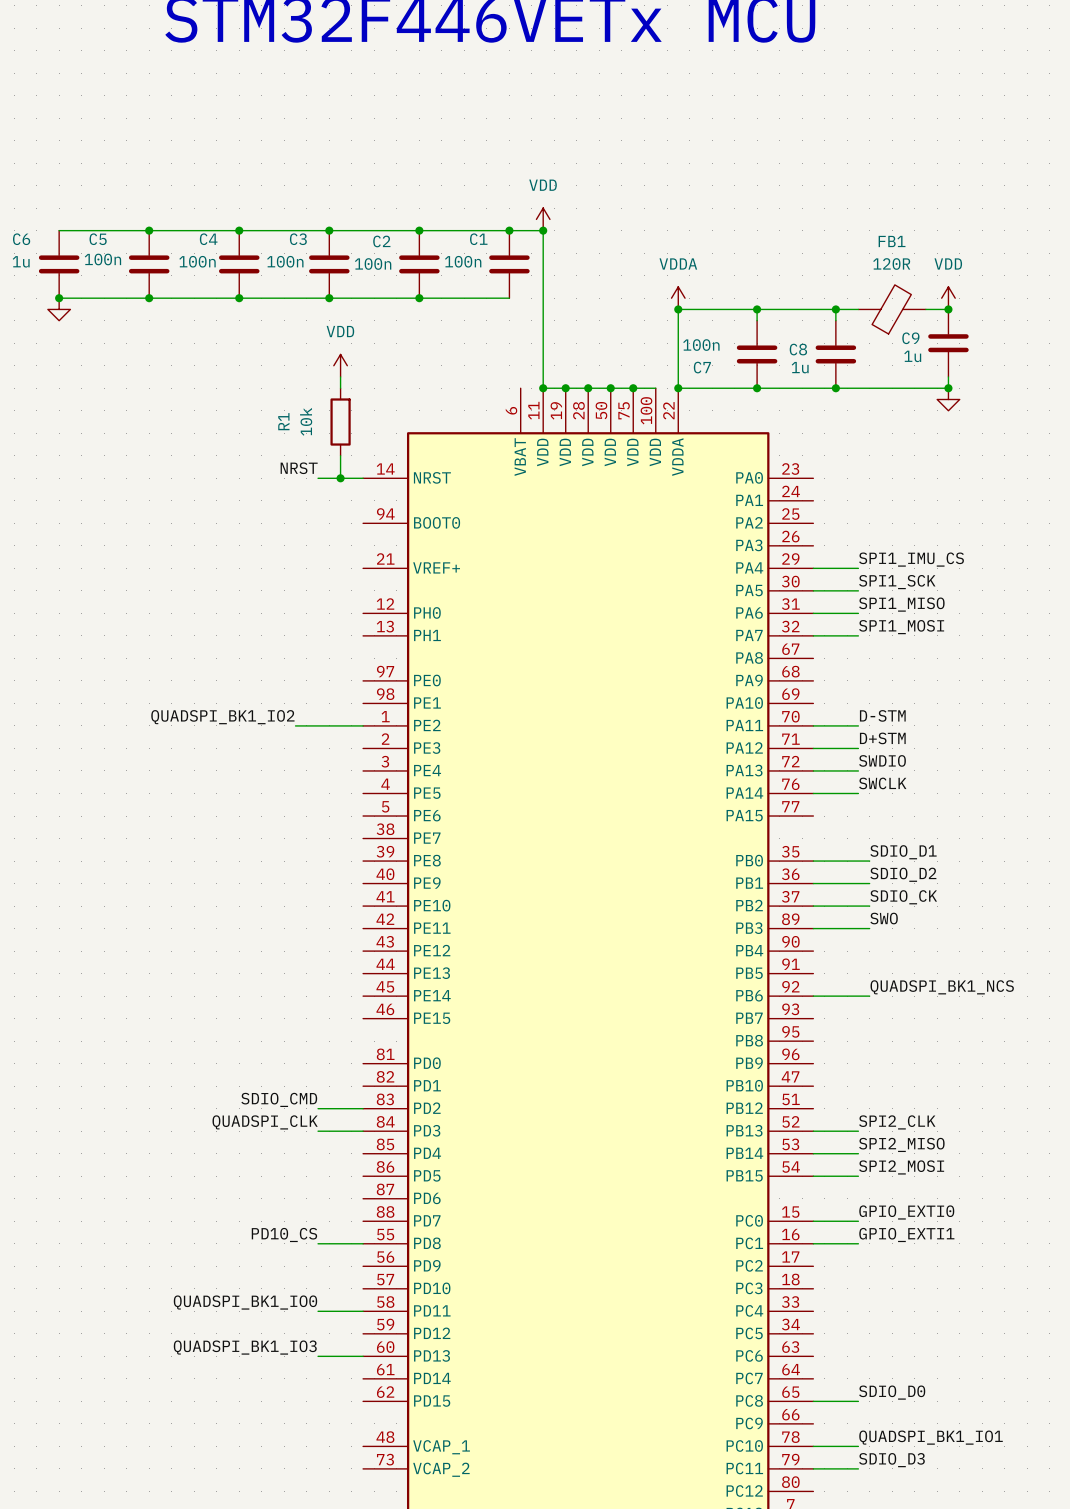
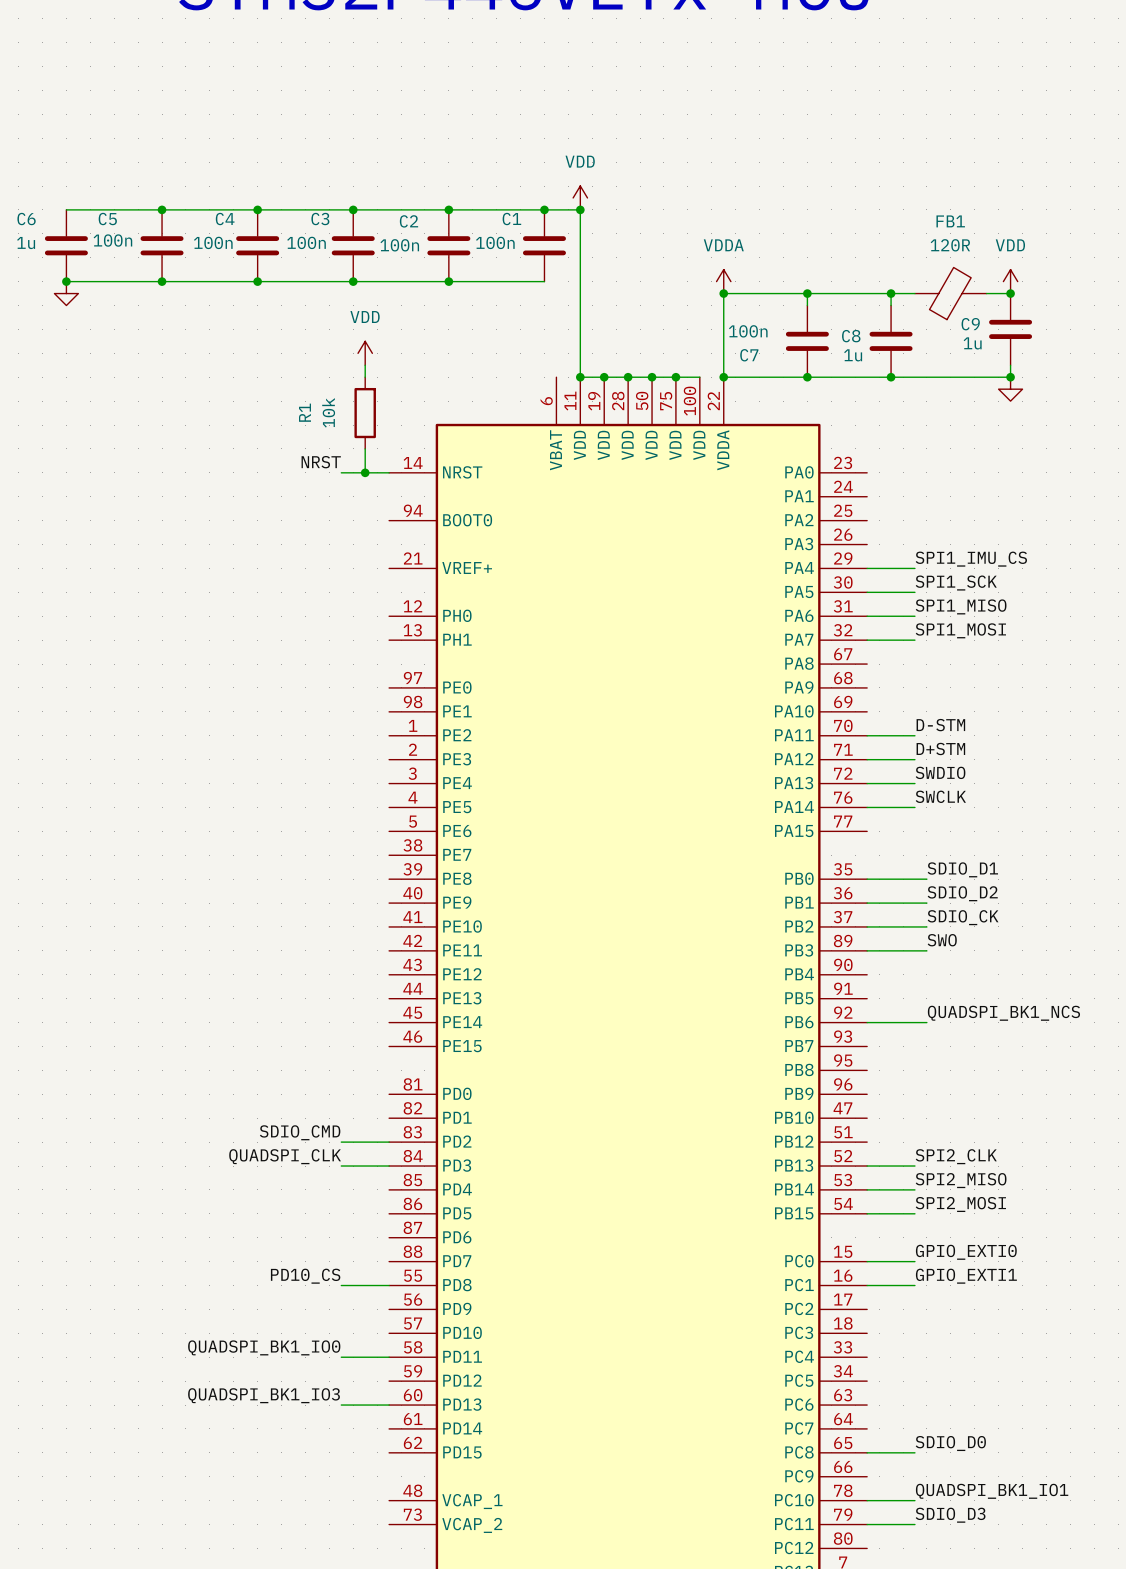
label: QUADSPI_BK1_IO2 (222, 717) -> none
wire: (295, 725) (363, 725) -> none

